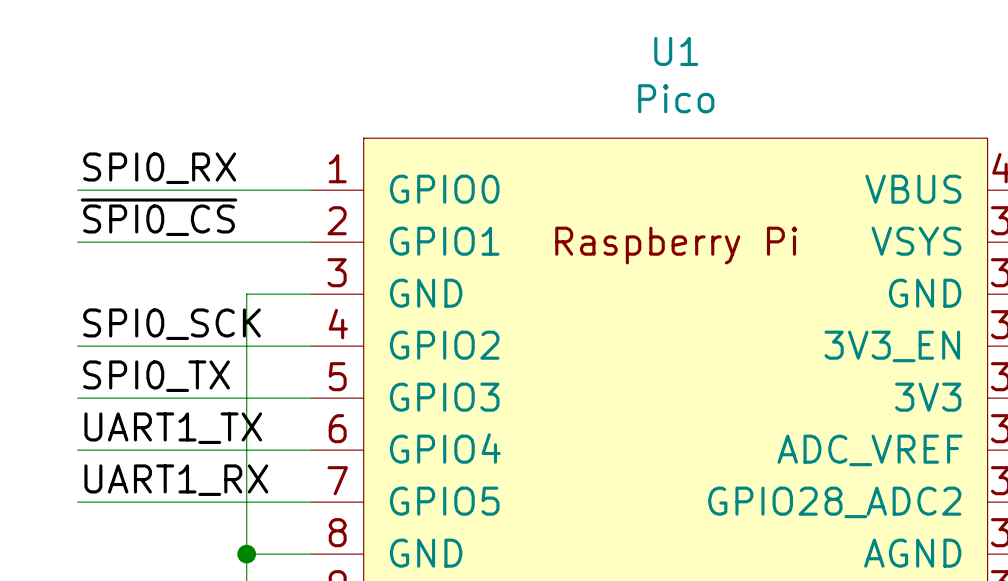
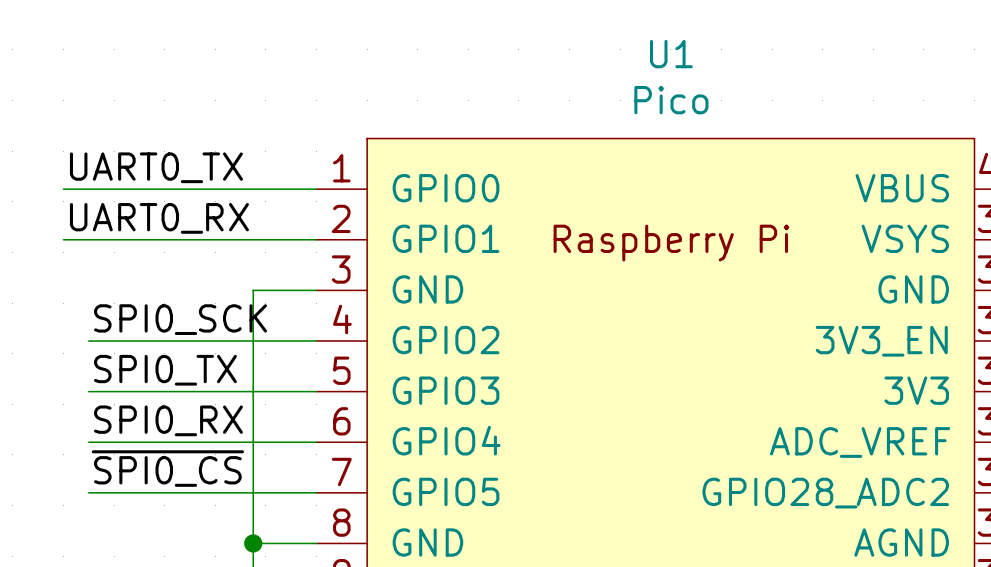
label: none -> UART0_TX (156, 167)
label: SPI0_RX (159, 168) -> none
wire: none -> (63, 189) (88, 189)
label: ~{SPI0_CS} (159, 217) -> none
label: none -> UART0_RX (159, 218)
wire: none -> (63, 239) (88, 239)
label: UART1_TX (173, 428) -> SPI0_RX (168, 420)
label: UART1_RX (176, 480) -> ~{SPI0_CS} (167, 468)

